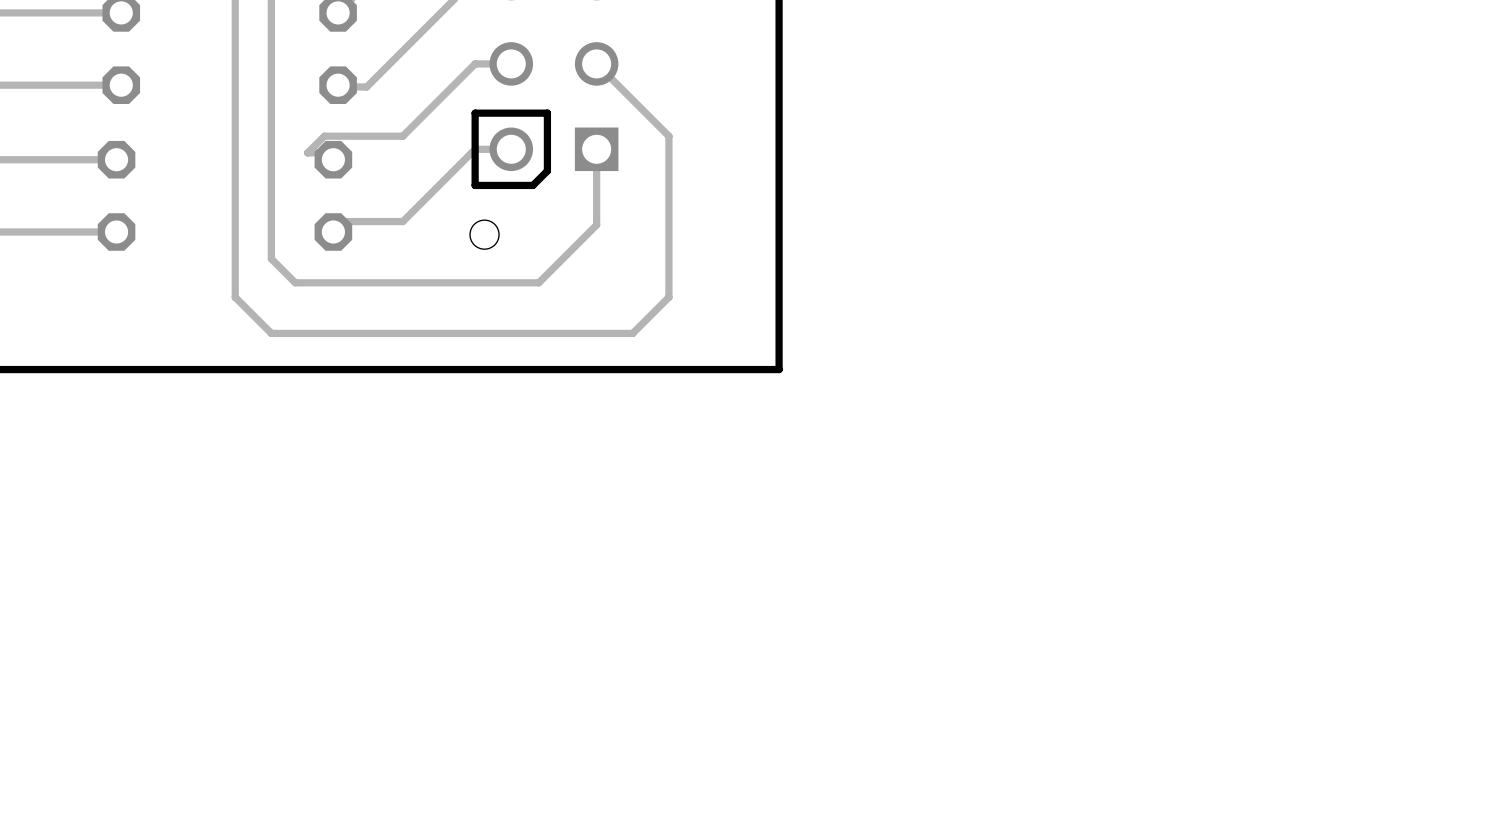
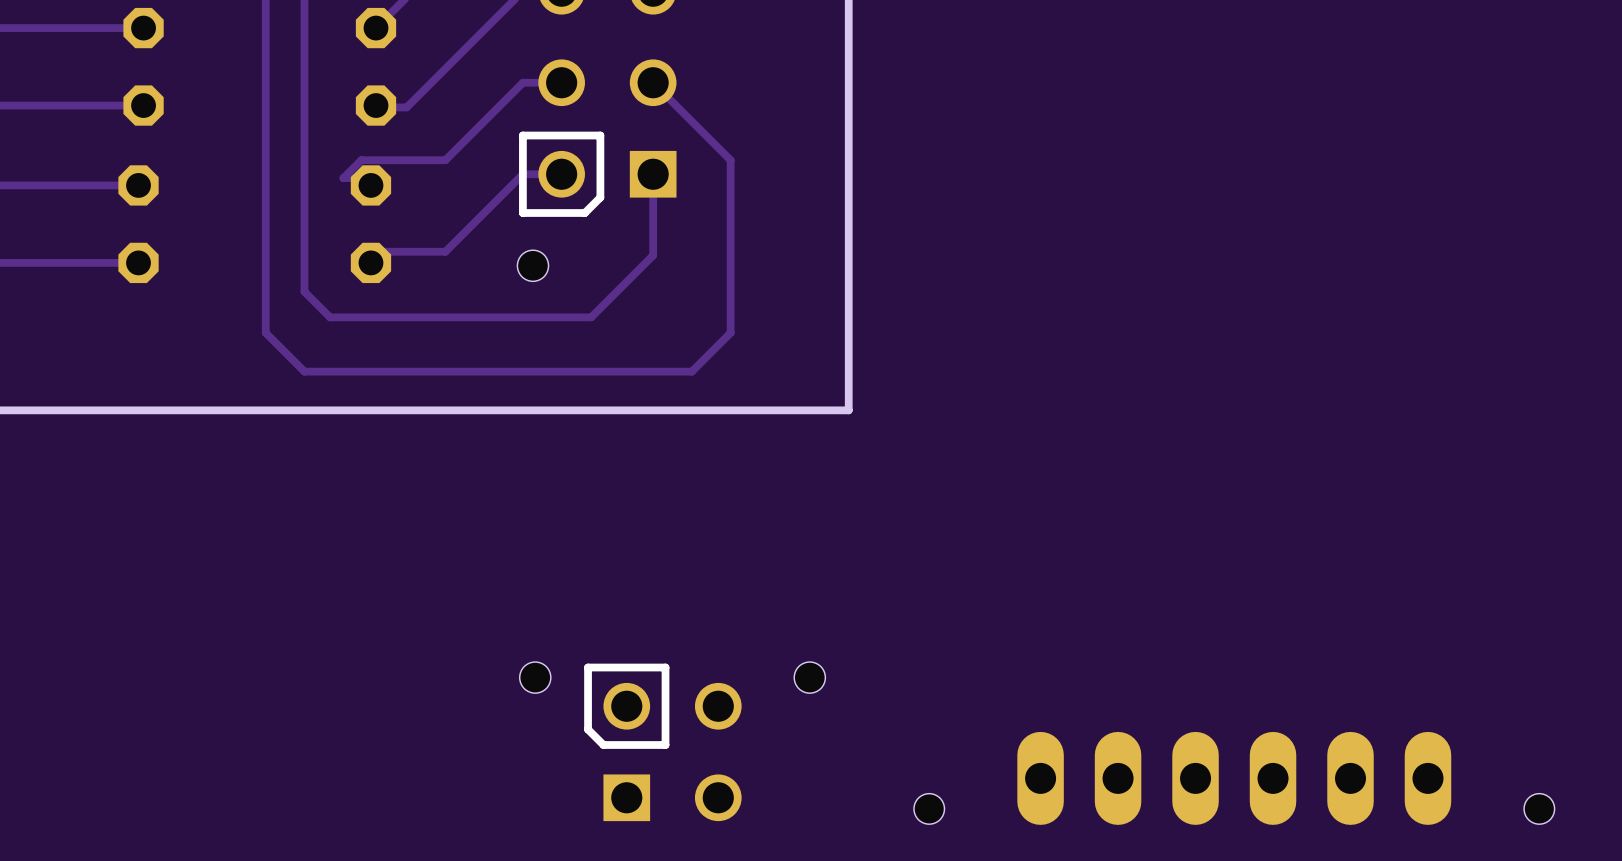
part: none -> (672, 741)
part: none -> (1234, 778)

